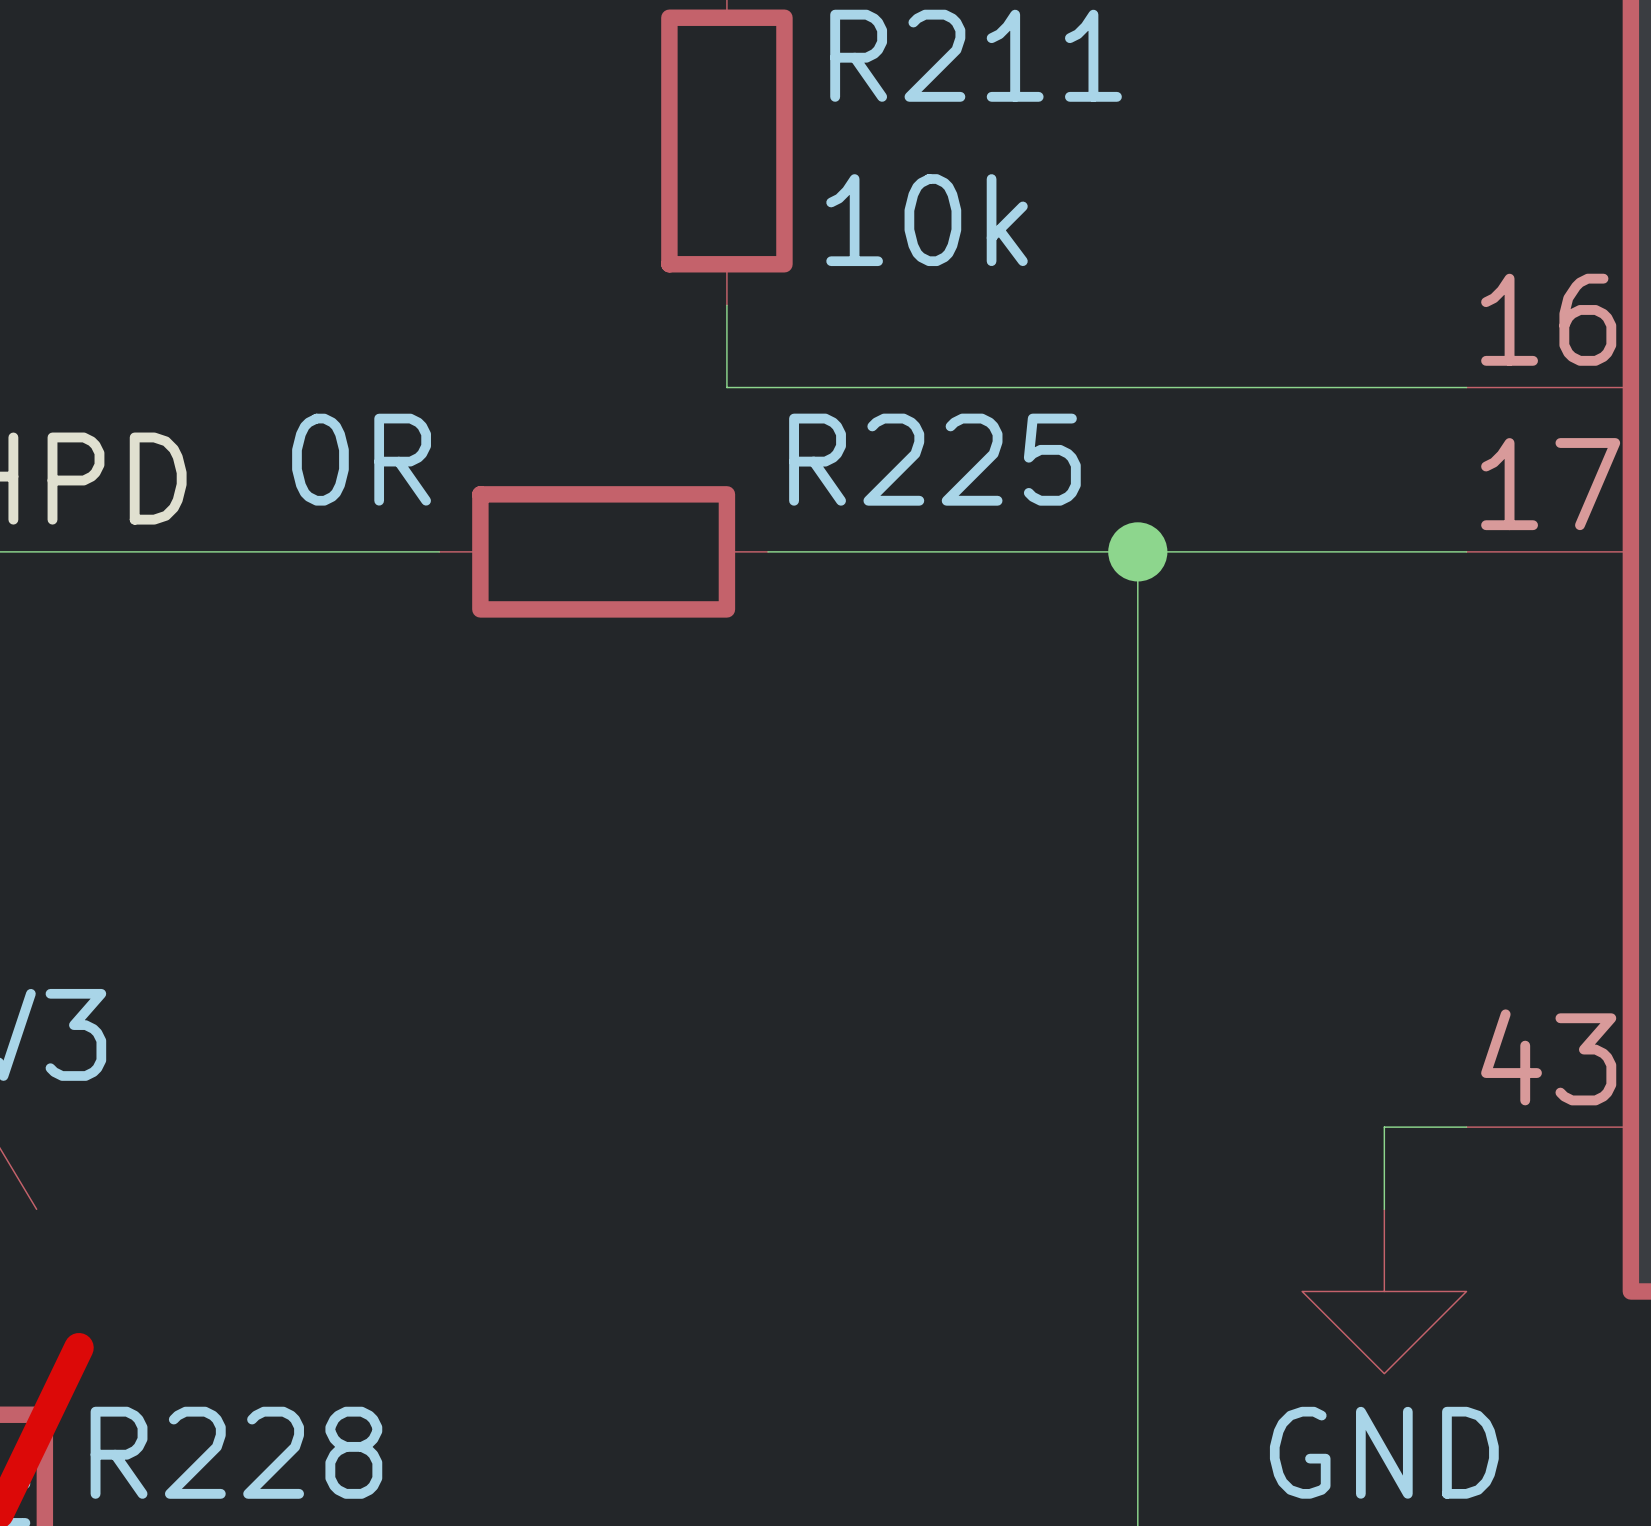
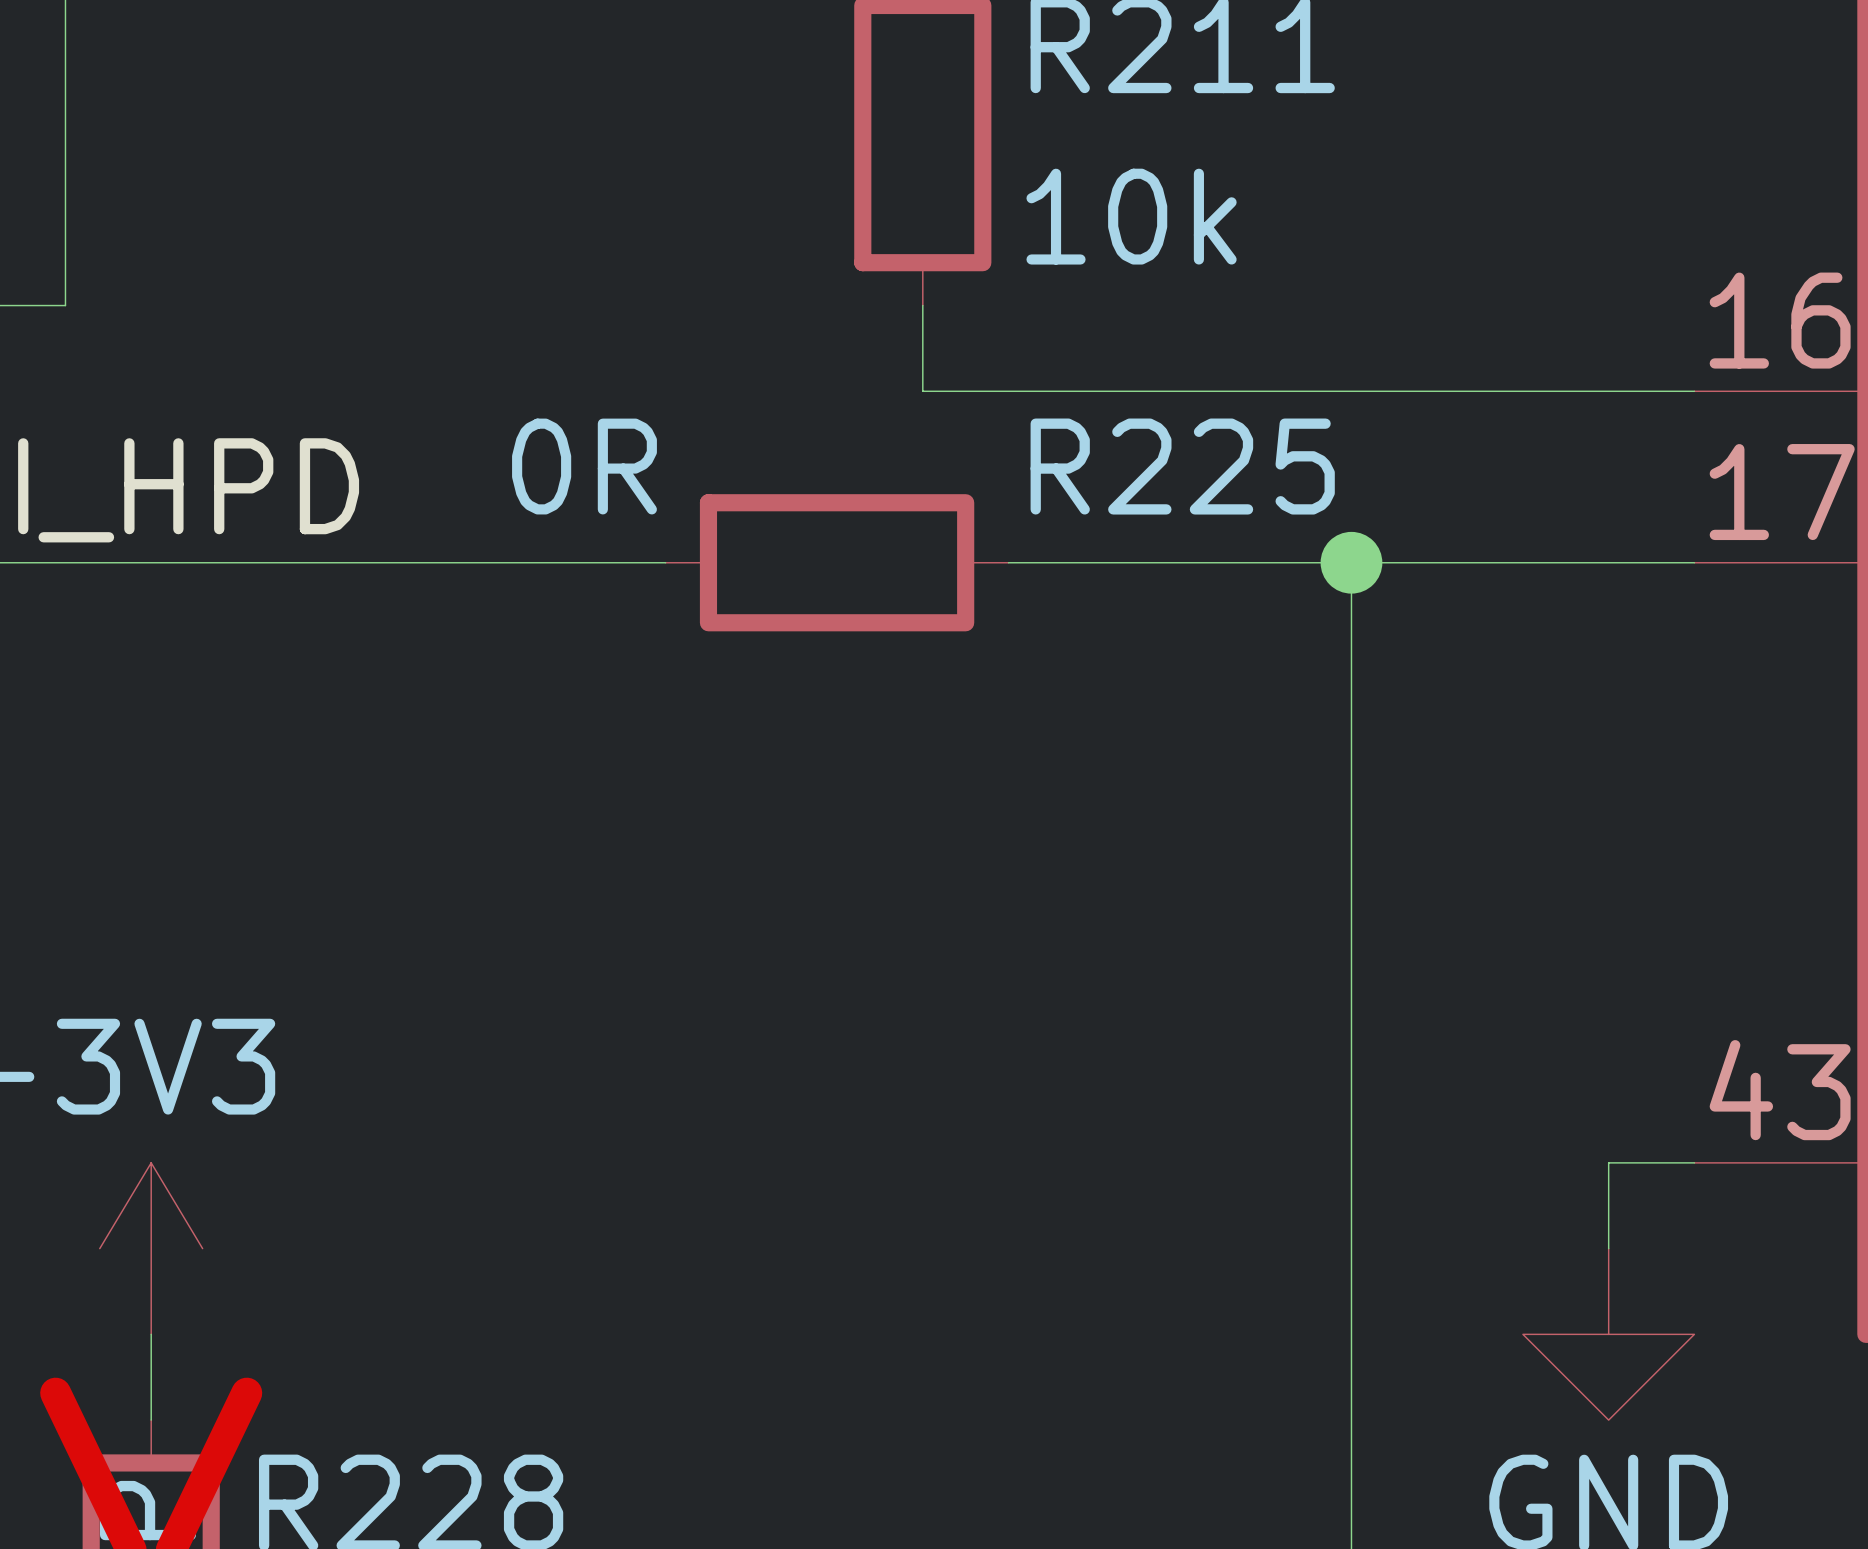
R225 position: (603, 551) -> (837, 562)

